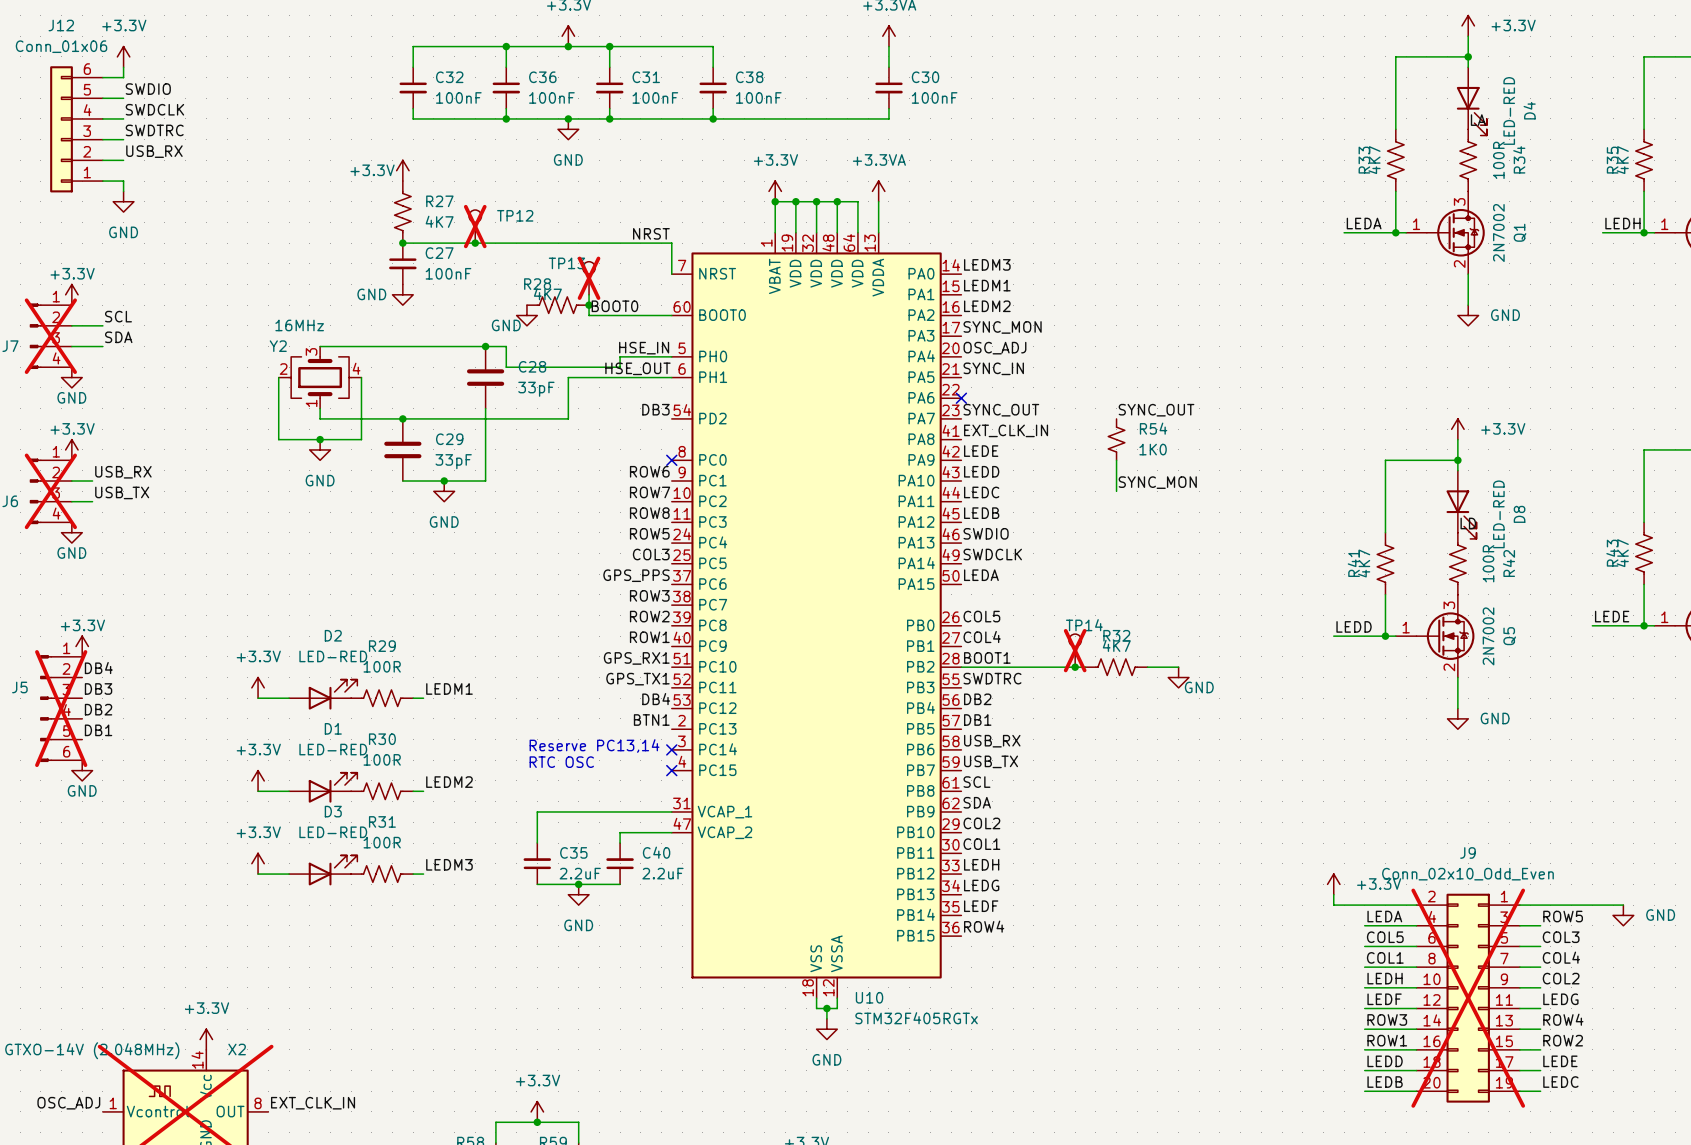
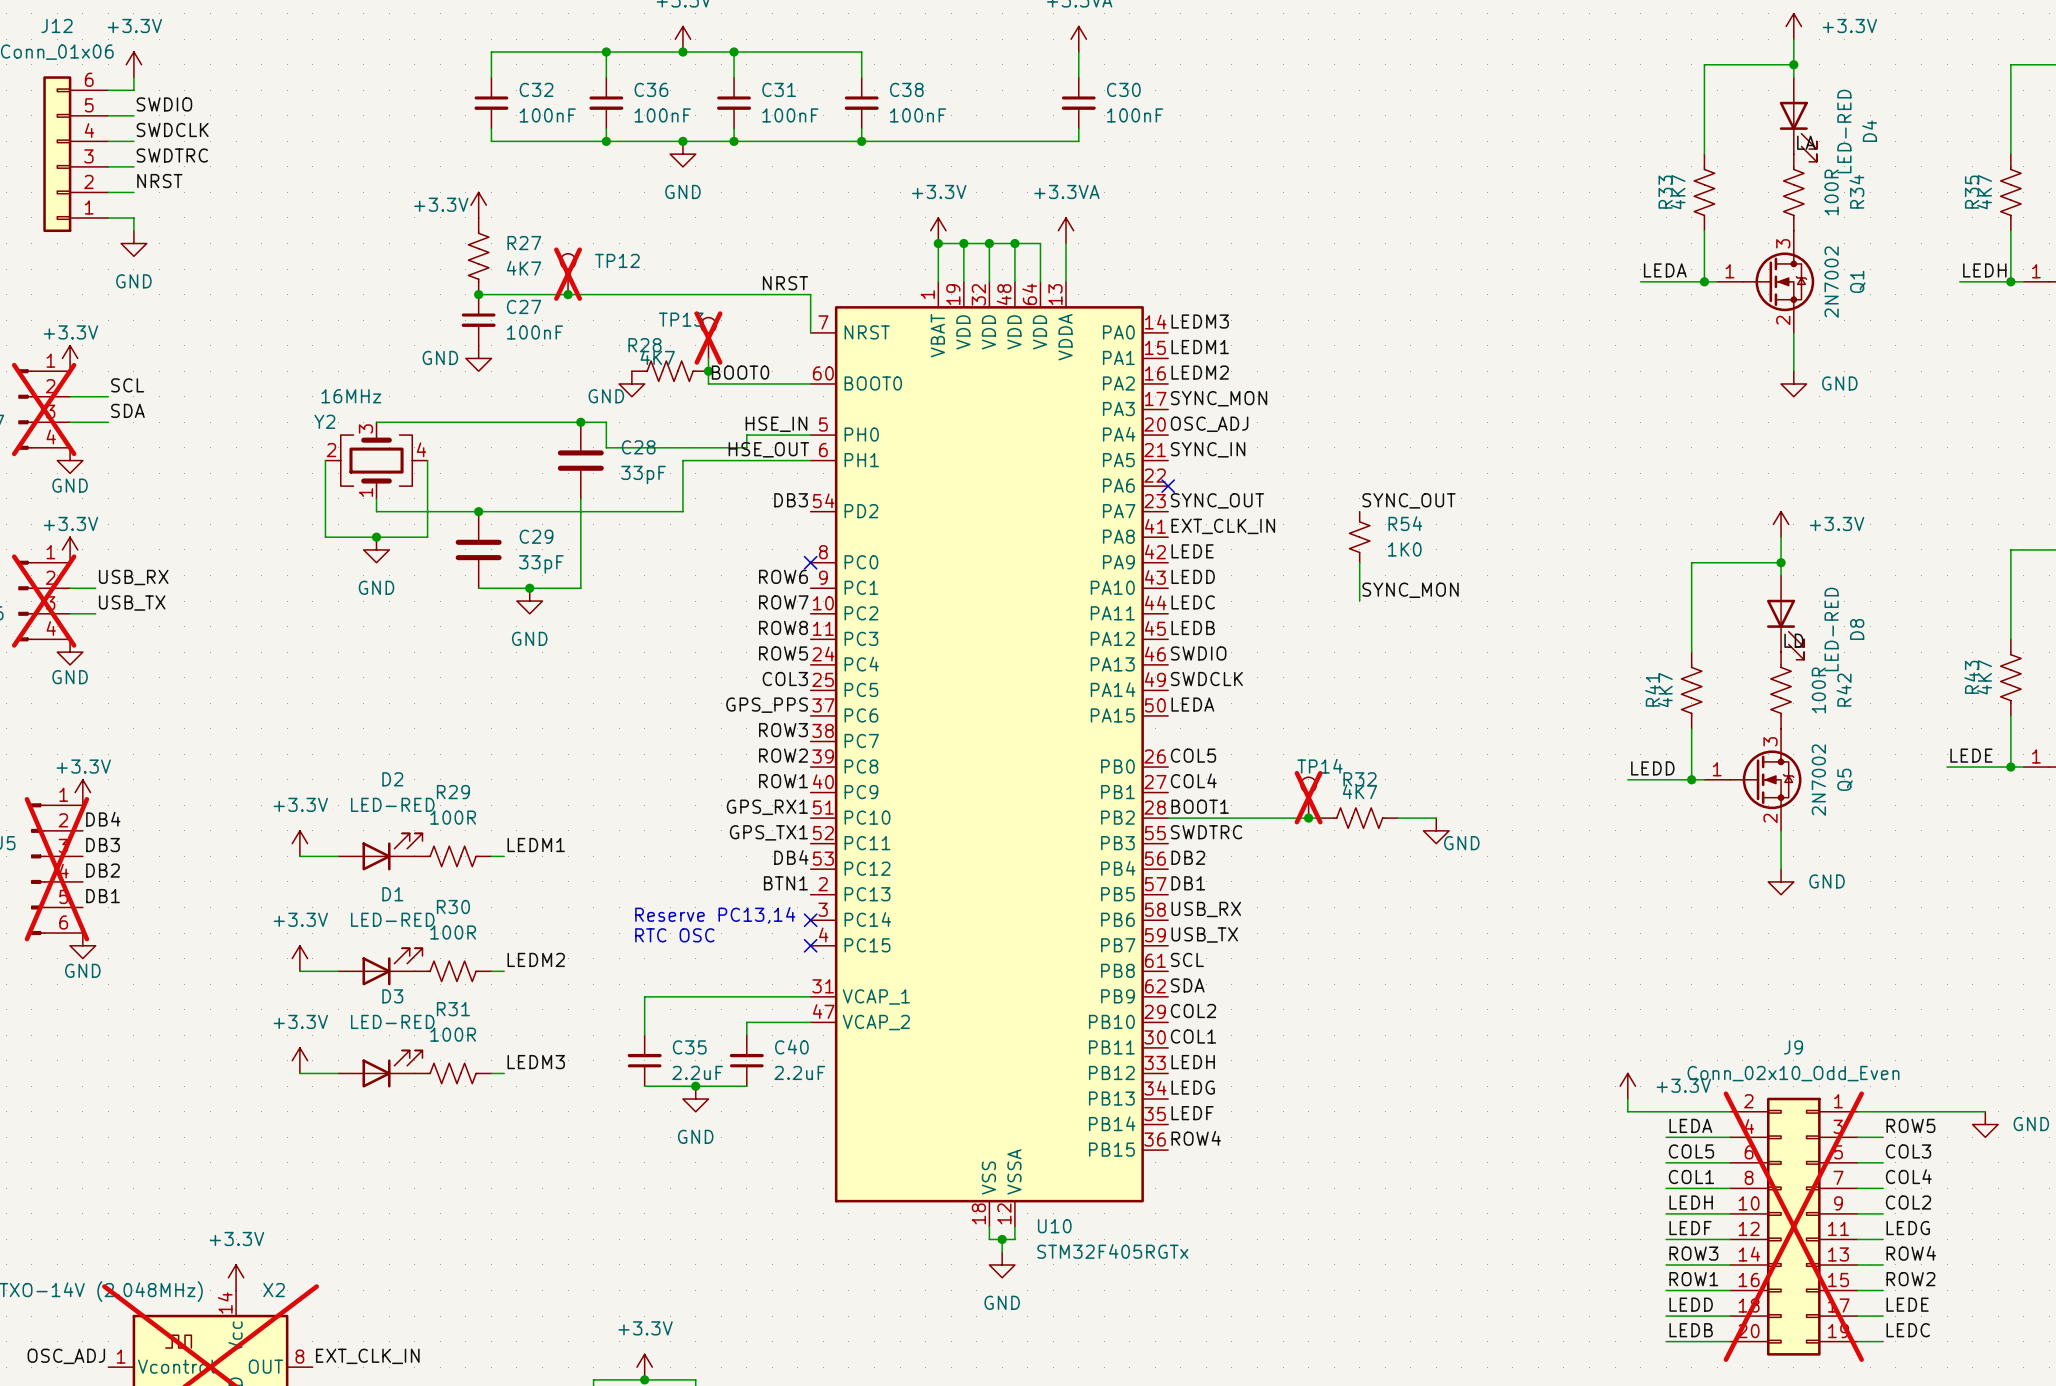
label: USB_RX (154, 151) -> NRST (159, 181)

